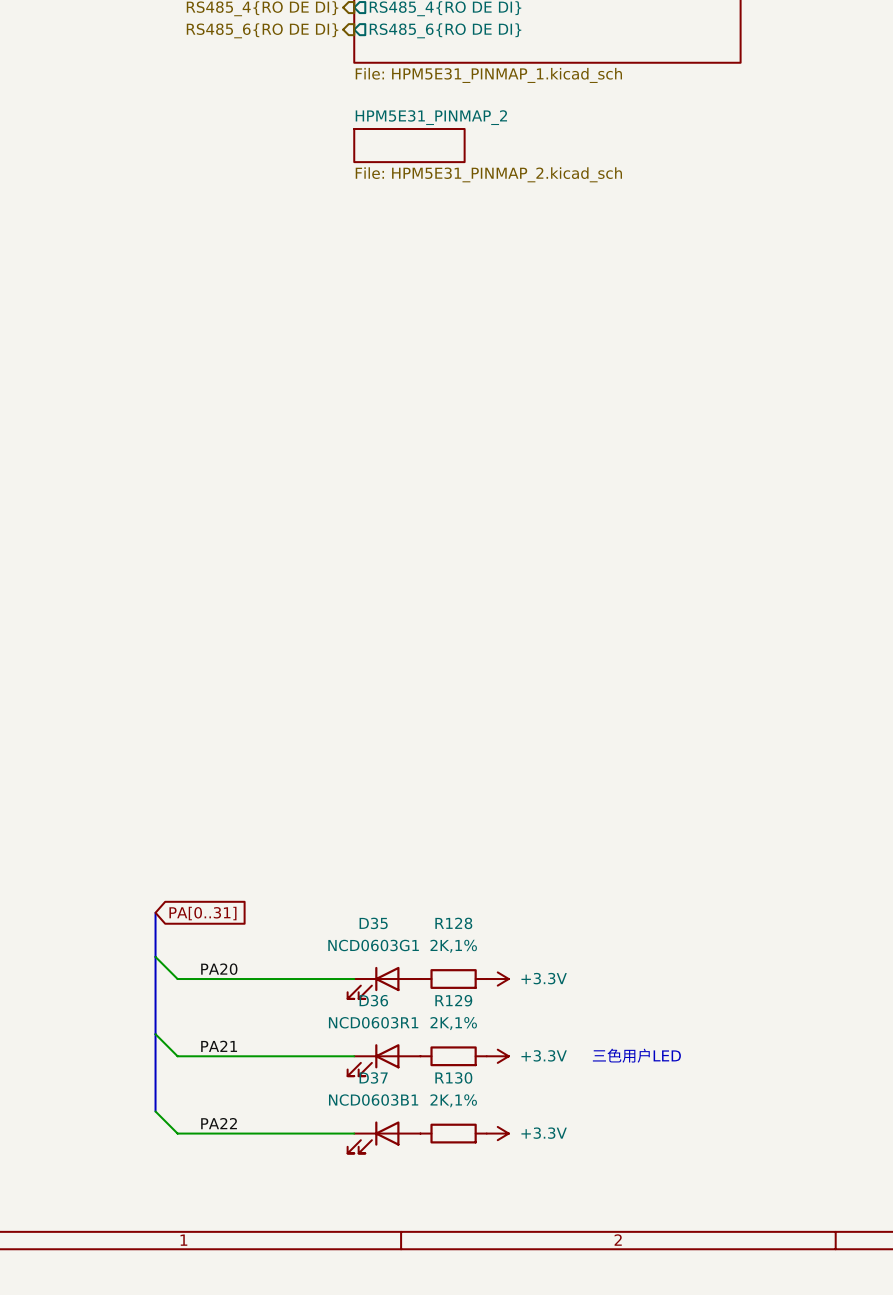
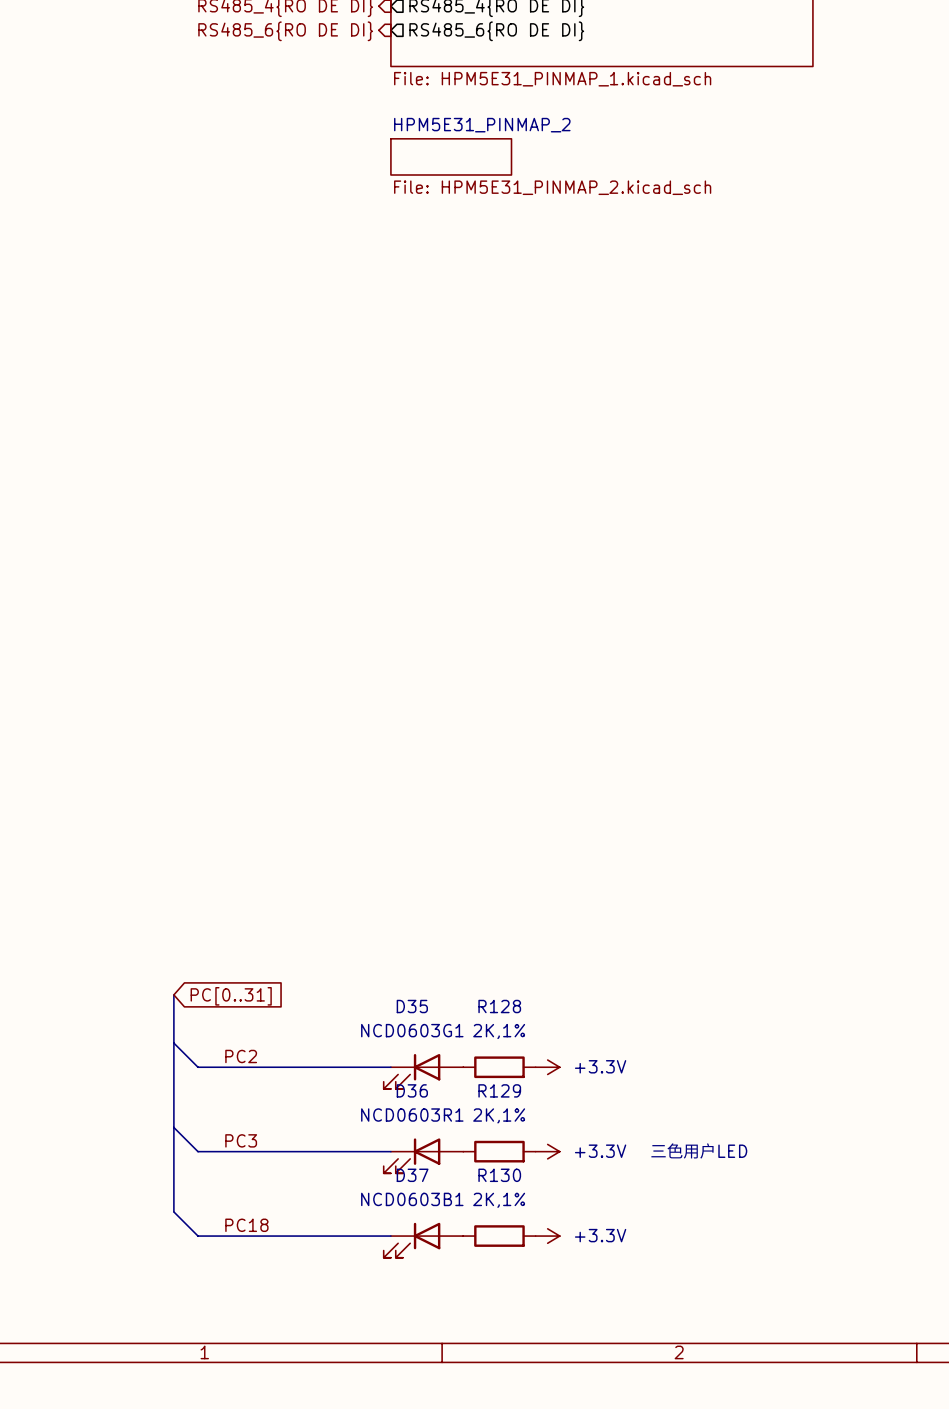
global label: PA[0..31] (202, 913) -> PC[0..31] (231, 996)
label: PA20 (219, 969) -> PC2 (241, 1056)
label: PA21 (219, 1046) -> PC3 (241, 1140)
label: PA22 (219, 1123) -> PC18 (246, 1225)

